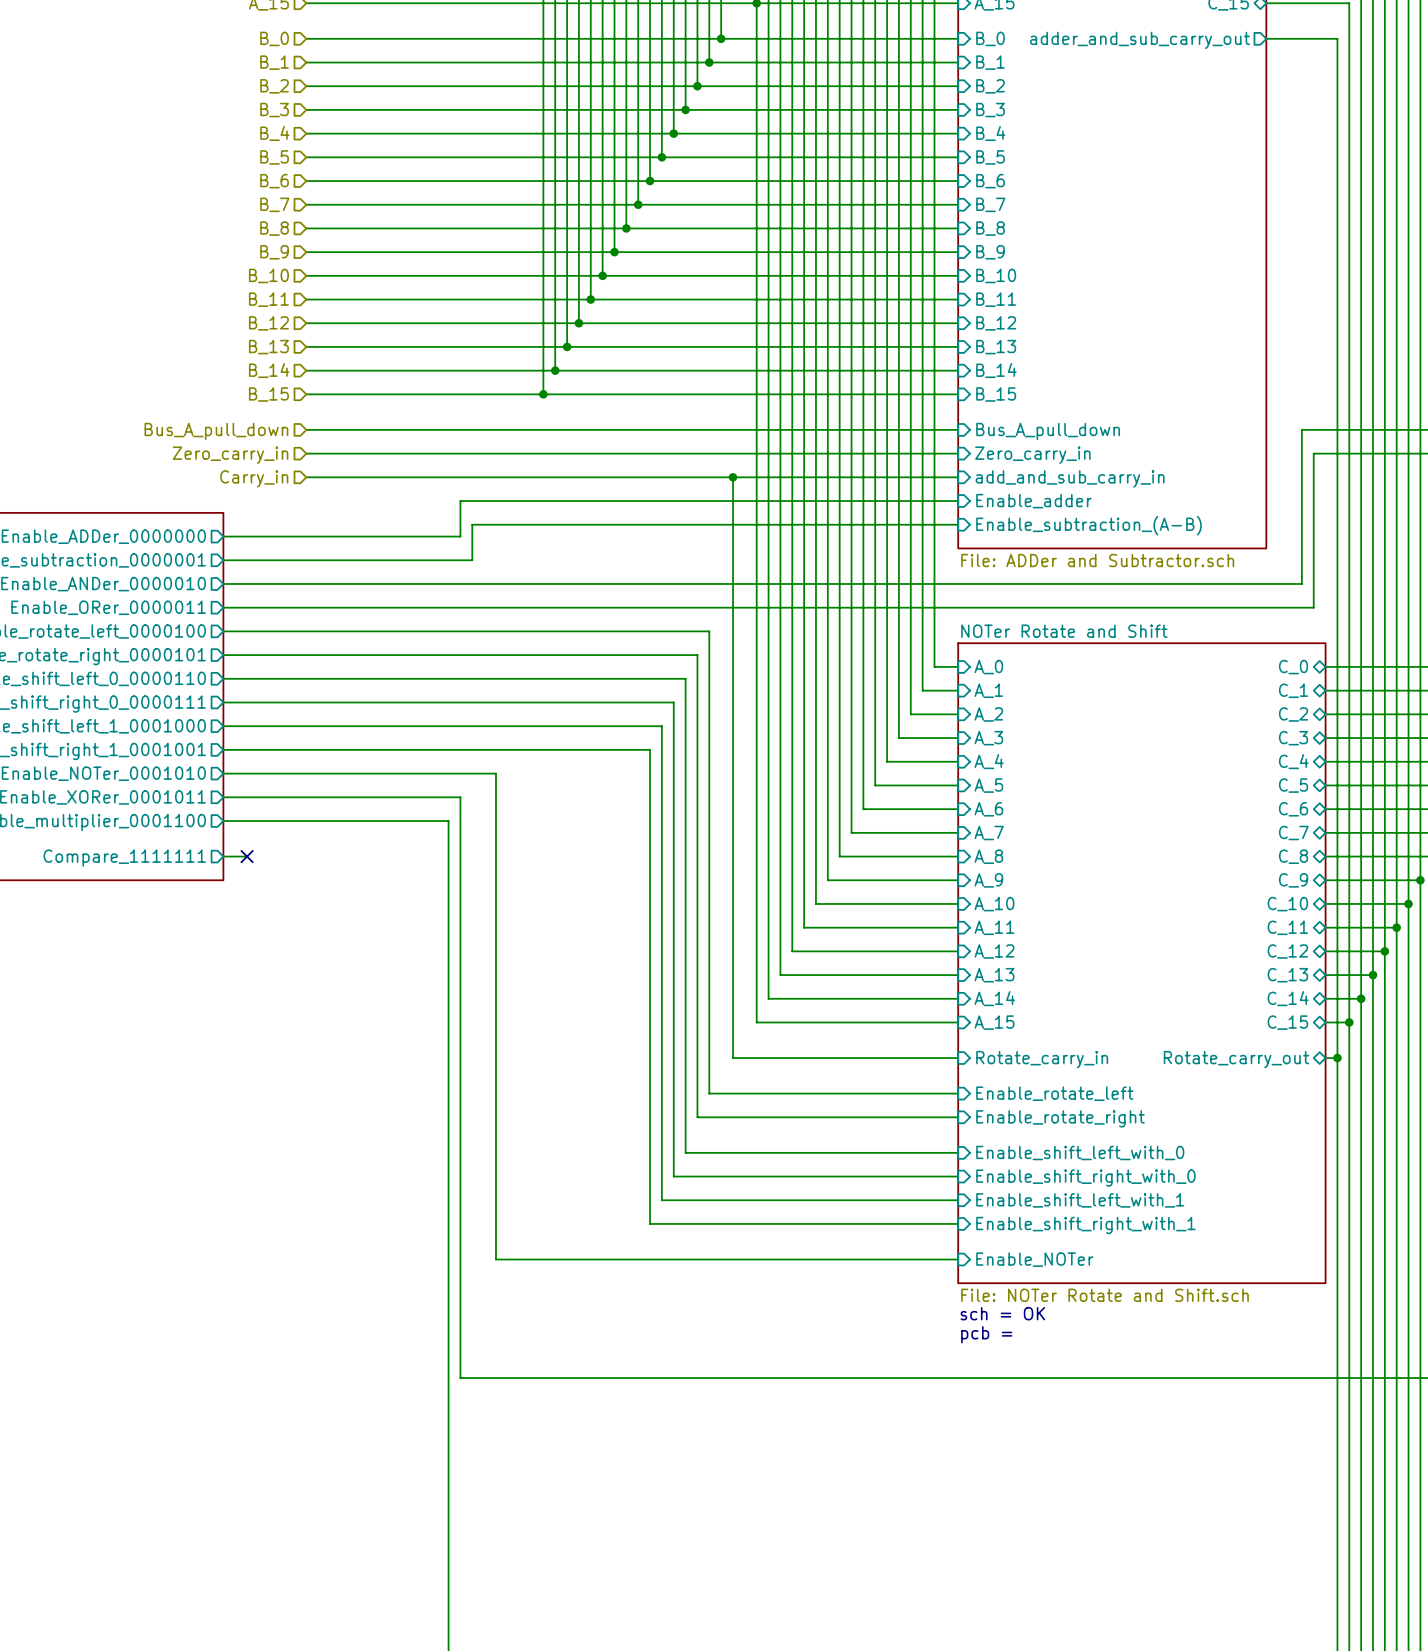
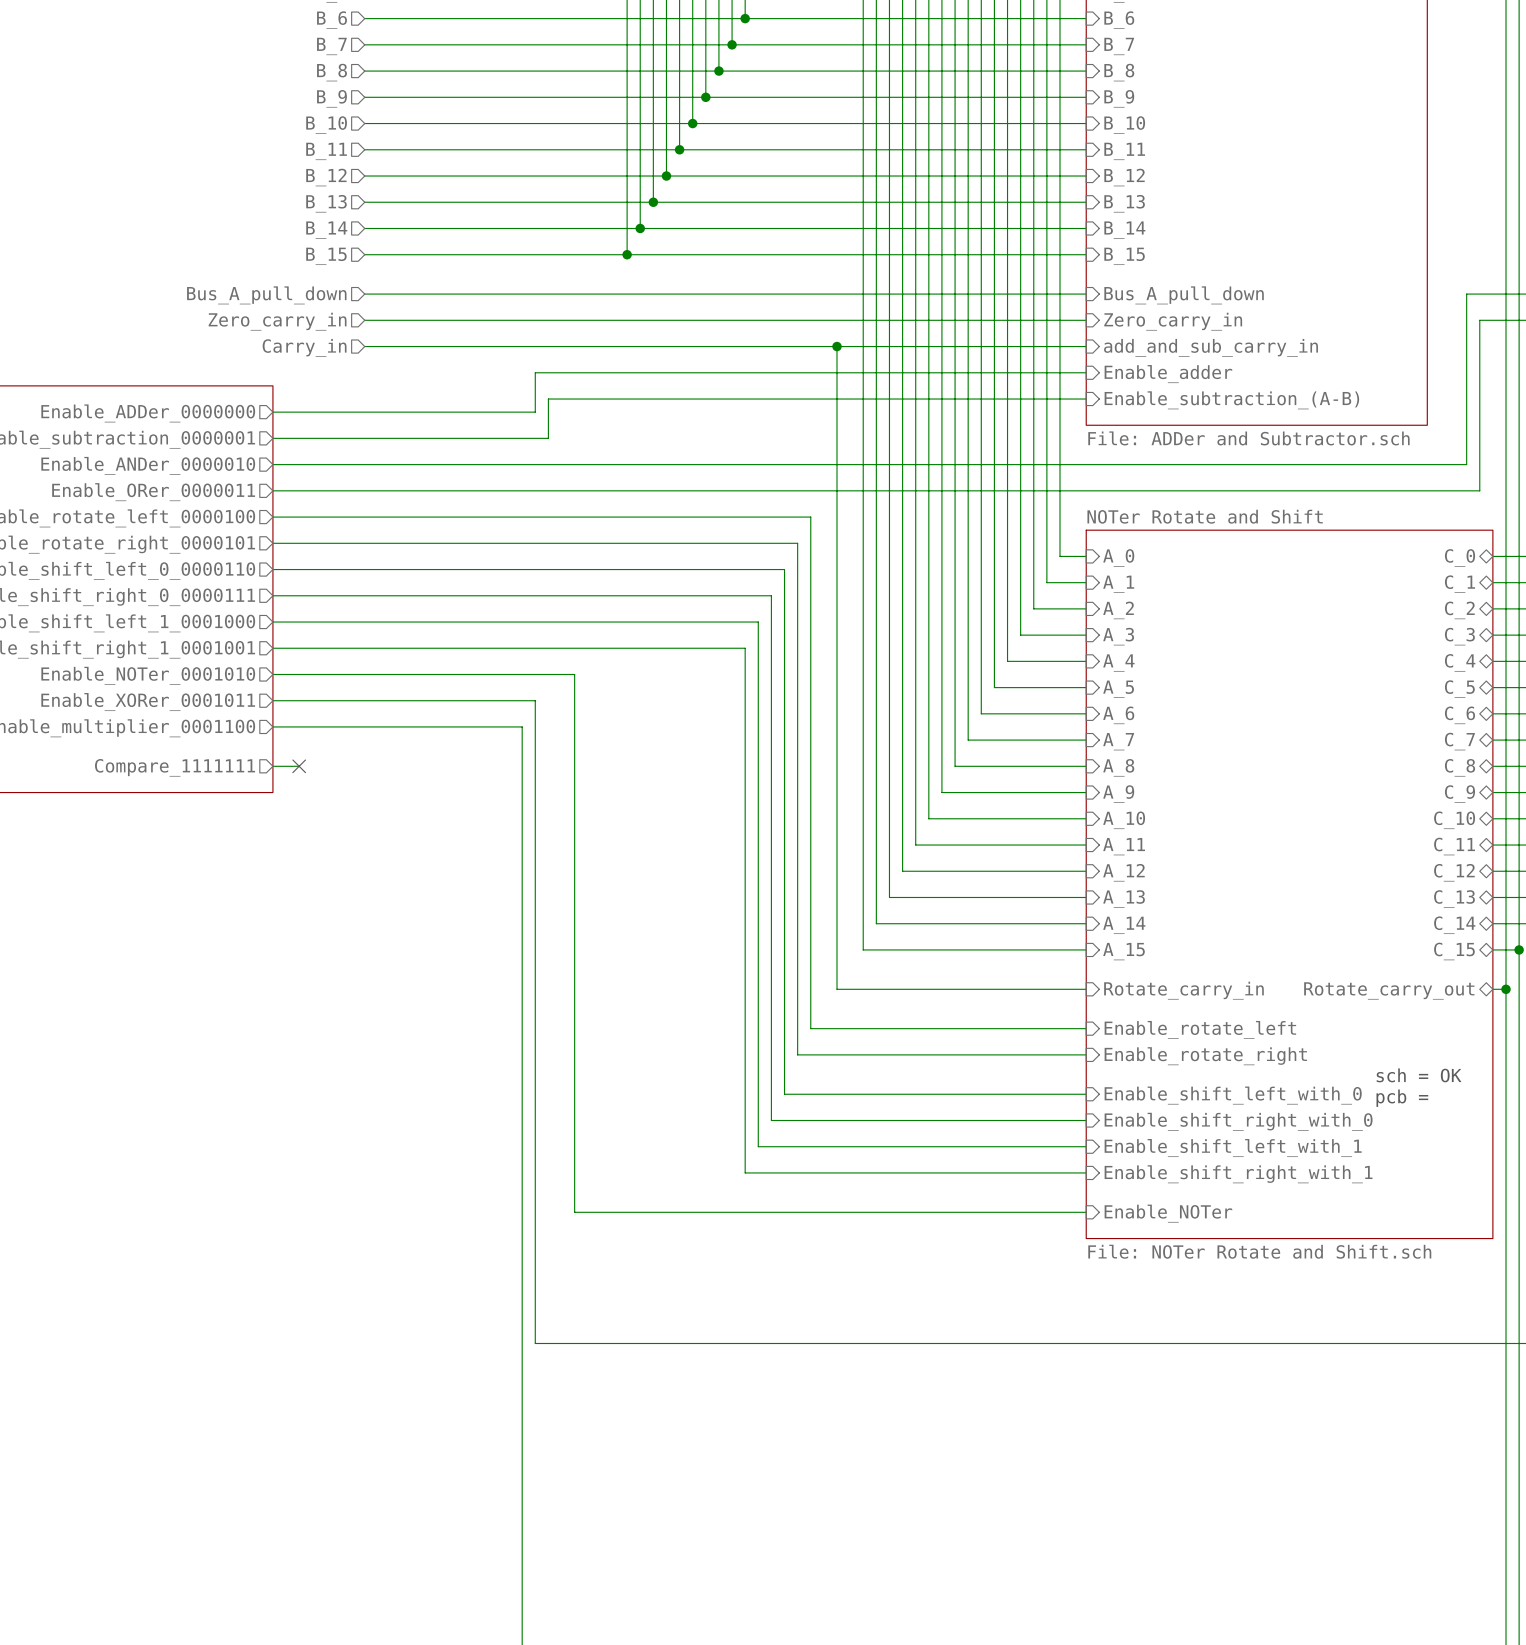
text: none -> sch = OK (1419, 1075)
text: none -> pcb = (1402, 1098)
text: sch = OK (1002, 1313) -> none
text: pcb = (986, 1334) -> none

